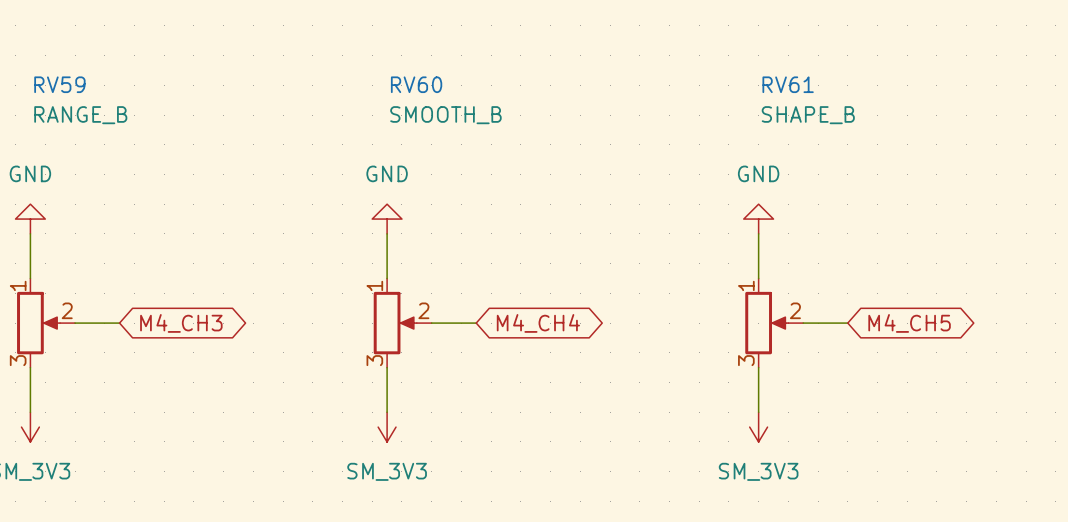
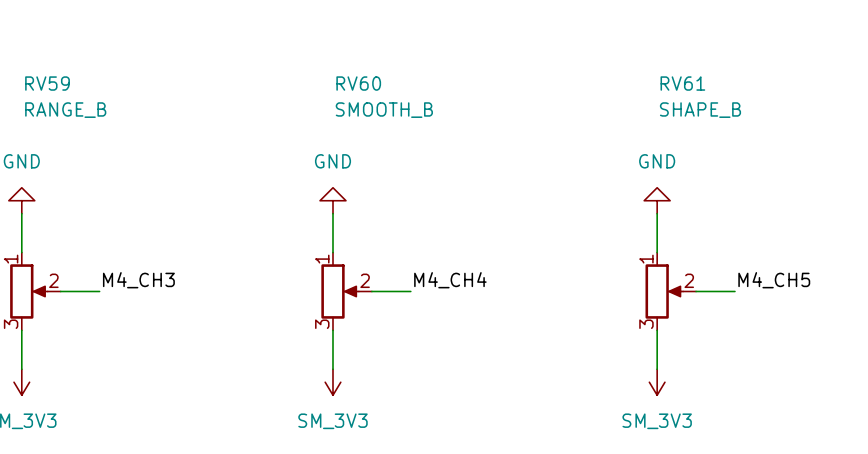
label: none -> M4_CH3 (138, 280)
label: none -> M4_CH4 (450, 280)
label: none -> M4_CH5 (774, 280)
global label: M4_CH3 (181, 323) -> none
global label: M4_CH4 (538, 323) -> none
global label: M4_CH5 (909, 323) -> none

